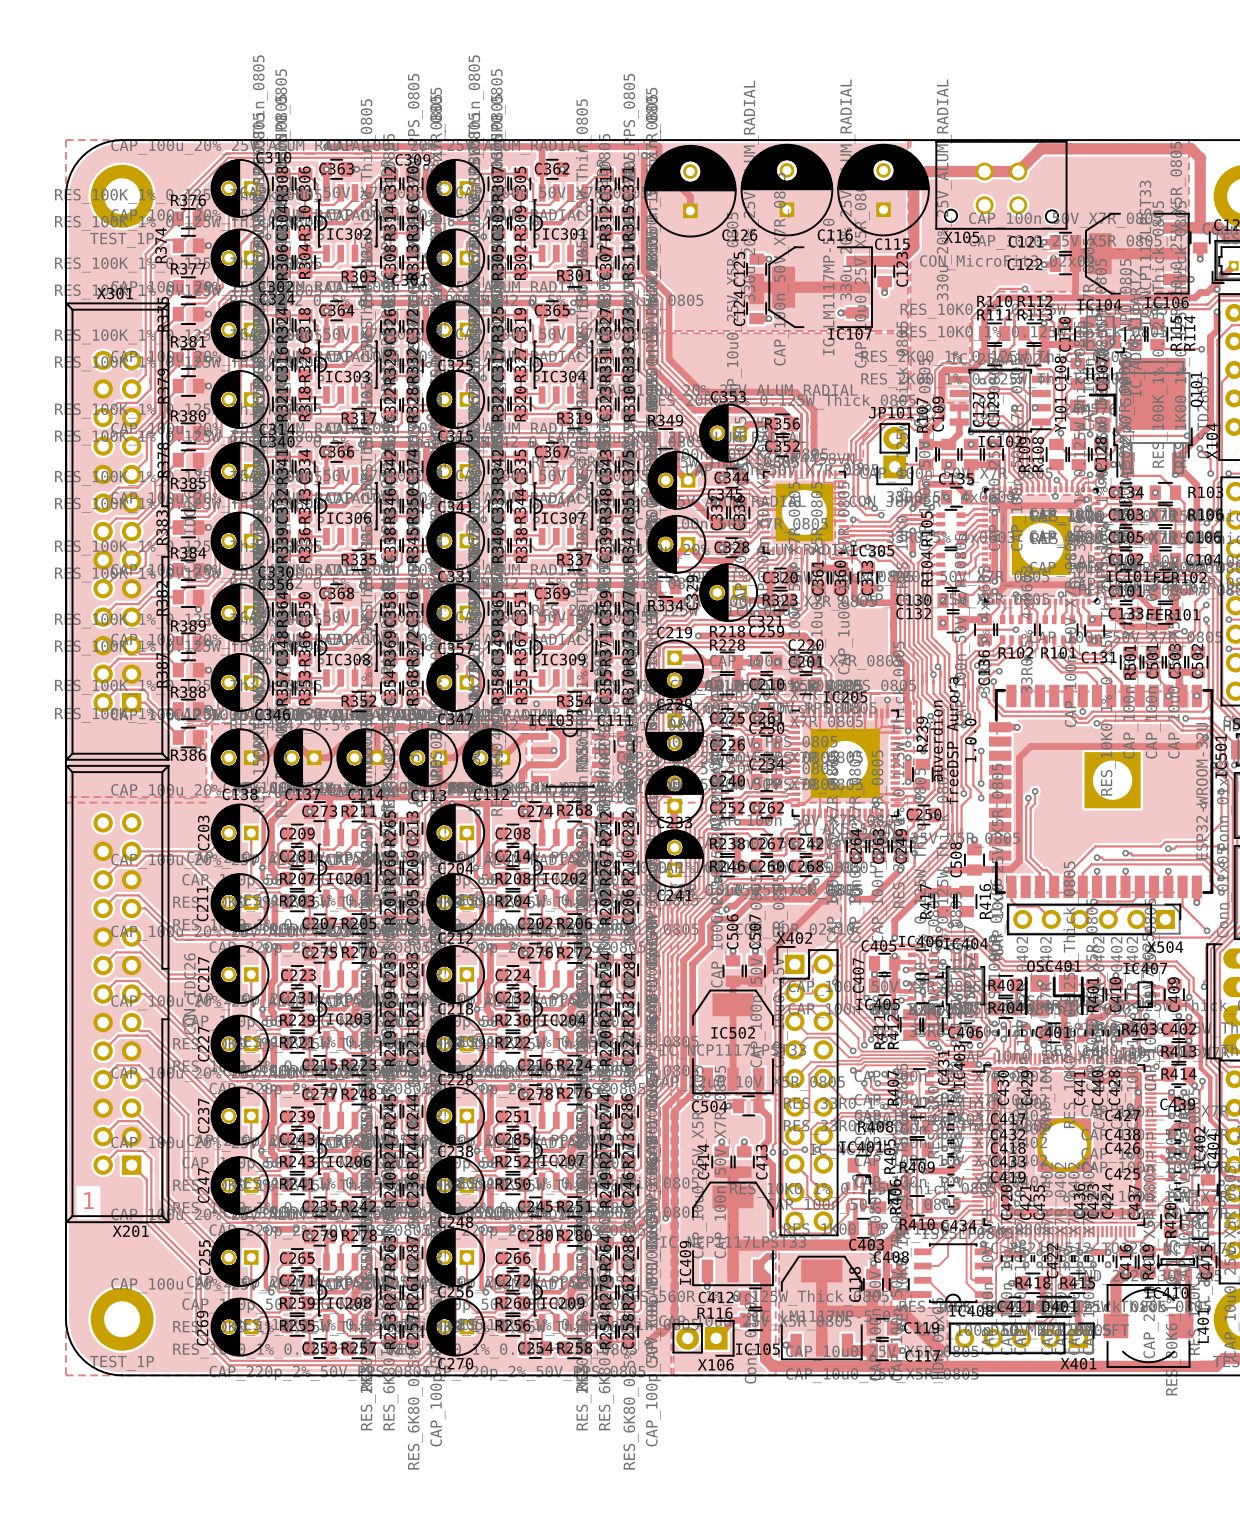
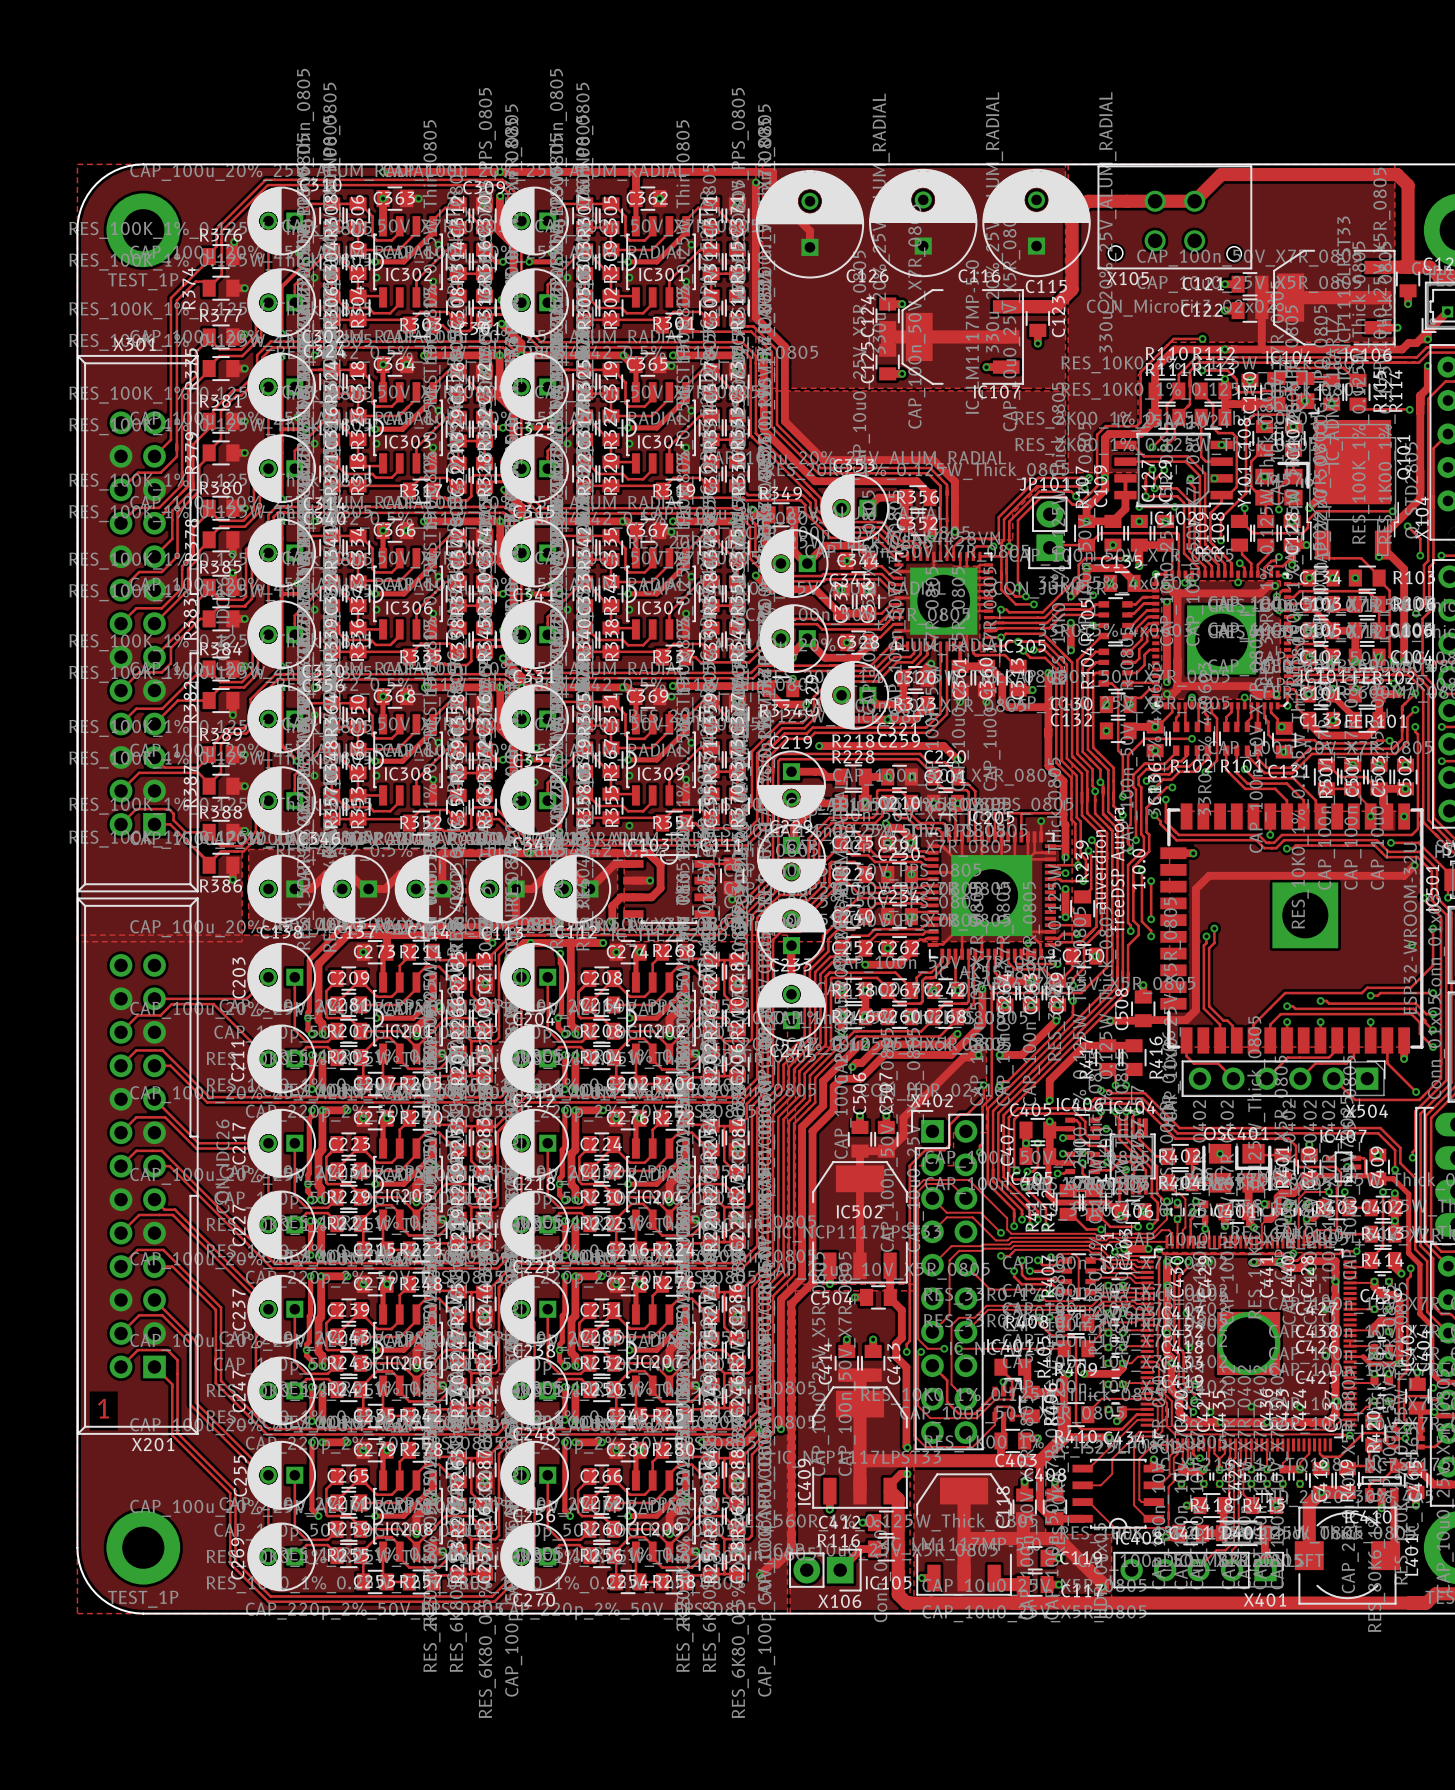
C125 name position: C125 (739, 269) -> C125 (867, 362)
C124 name position: C124 (739, 308) -> C124 (867, 316)

